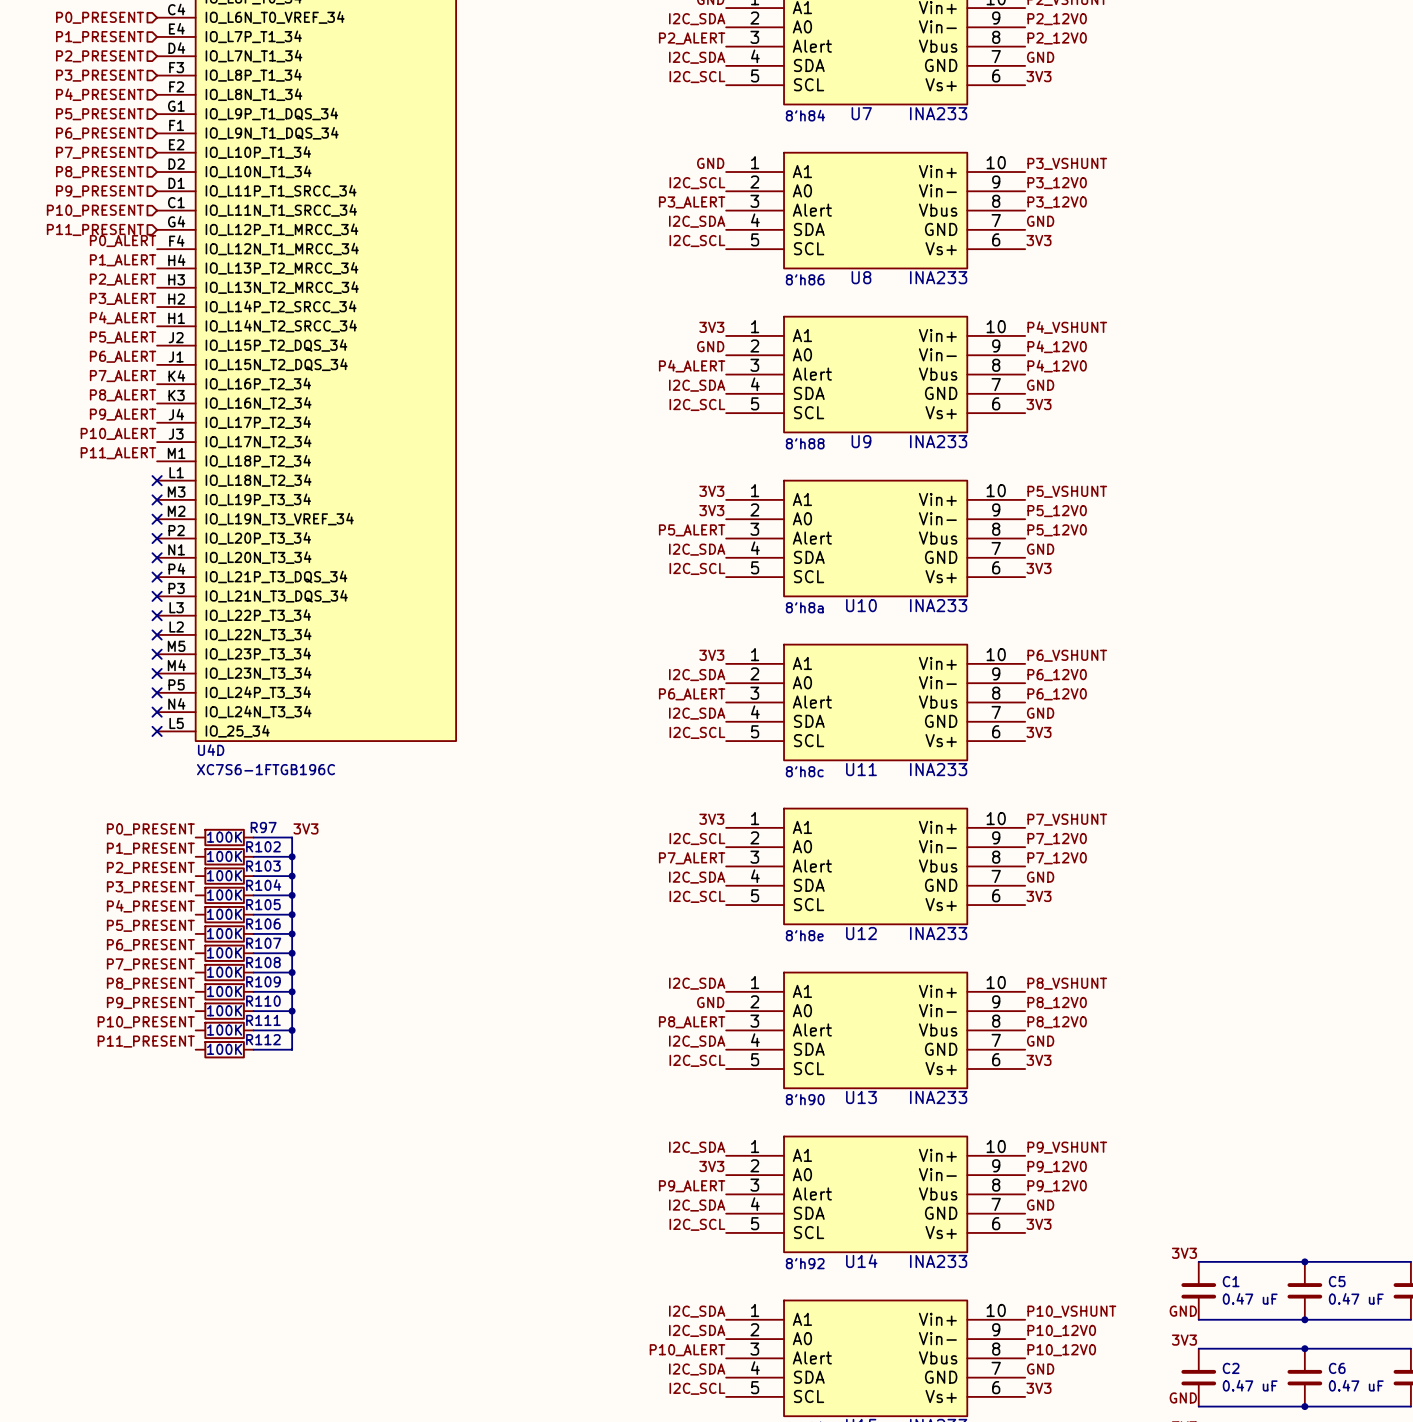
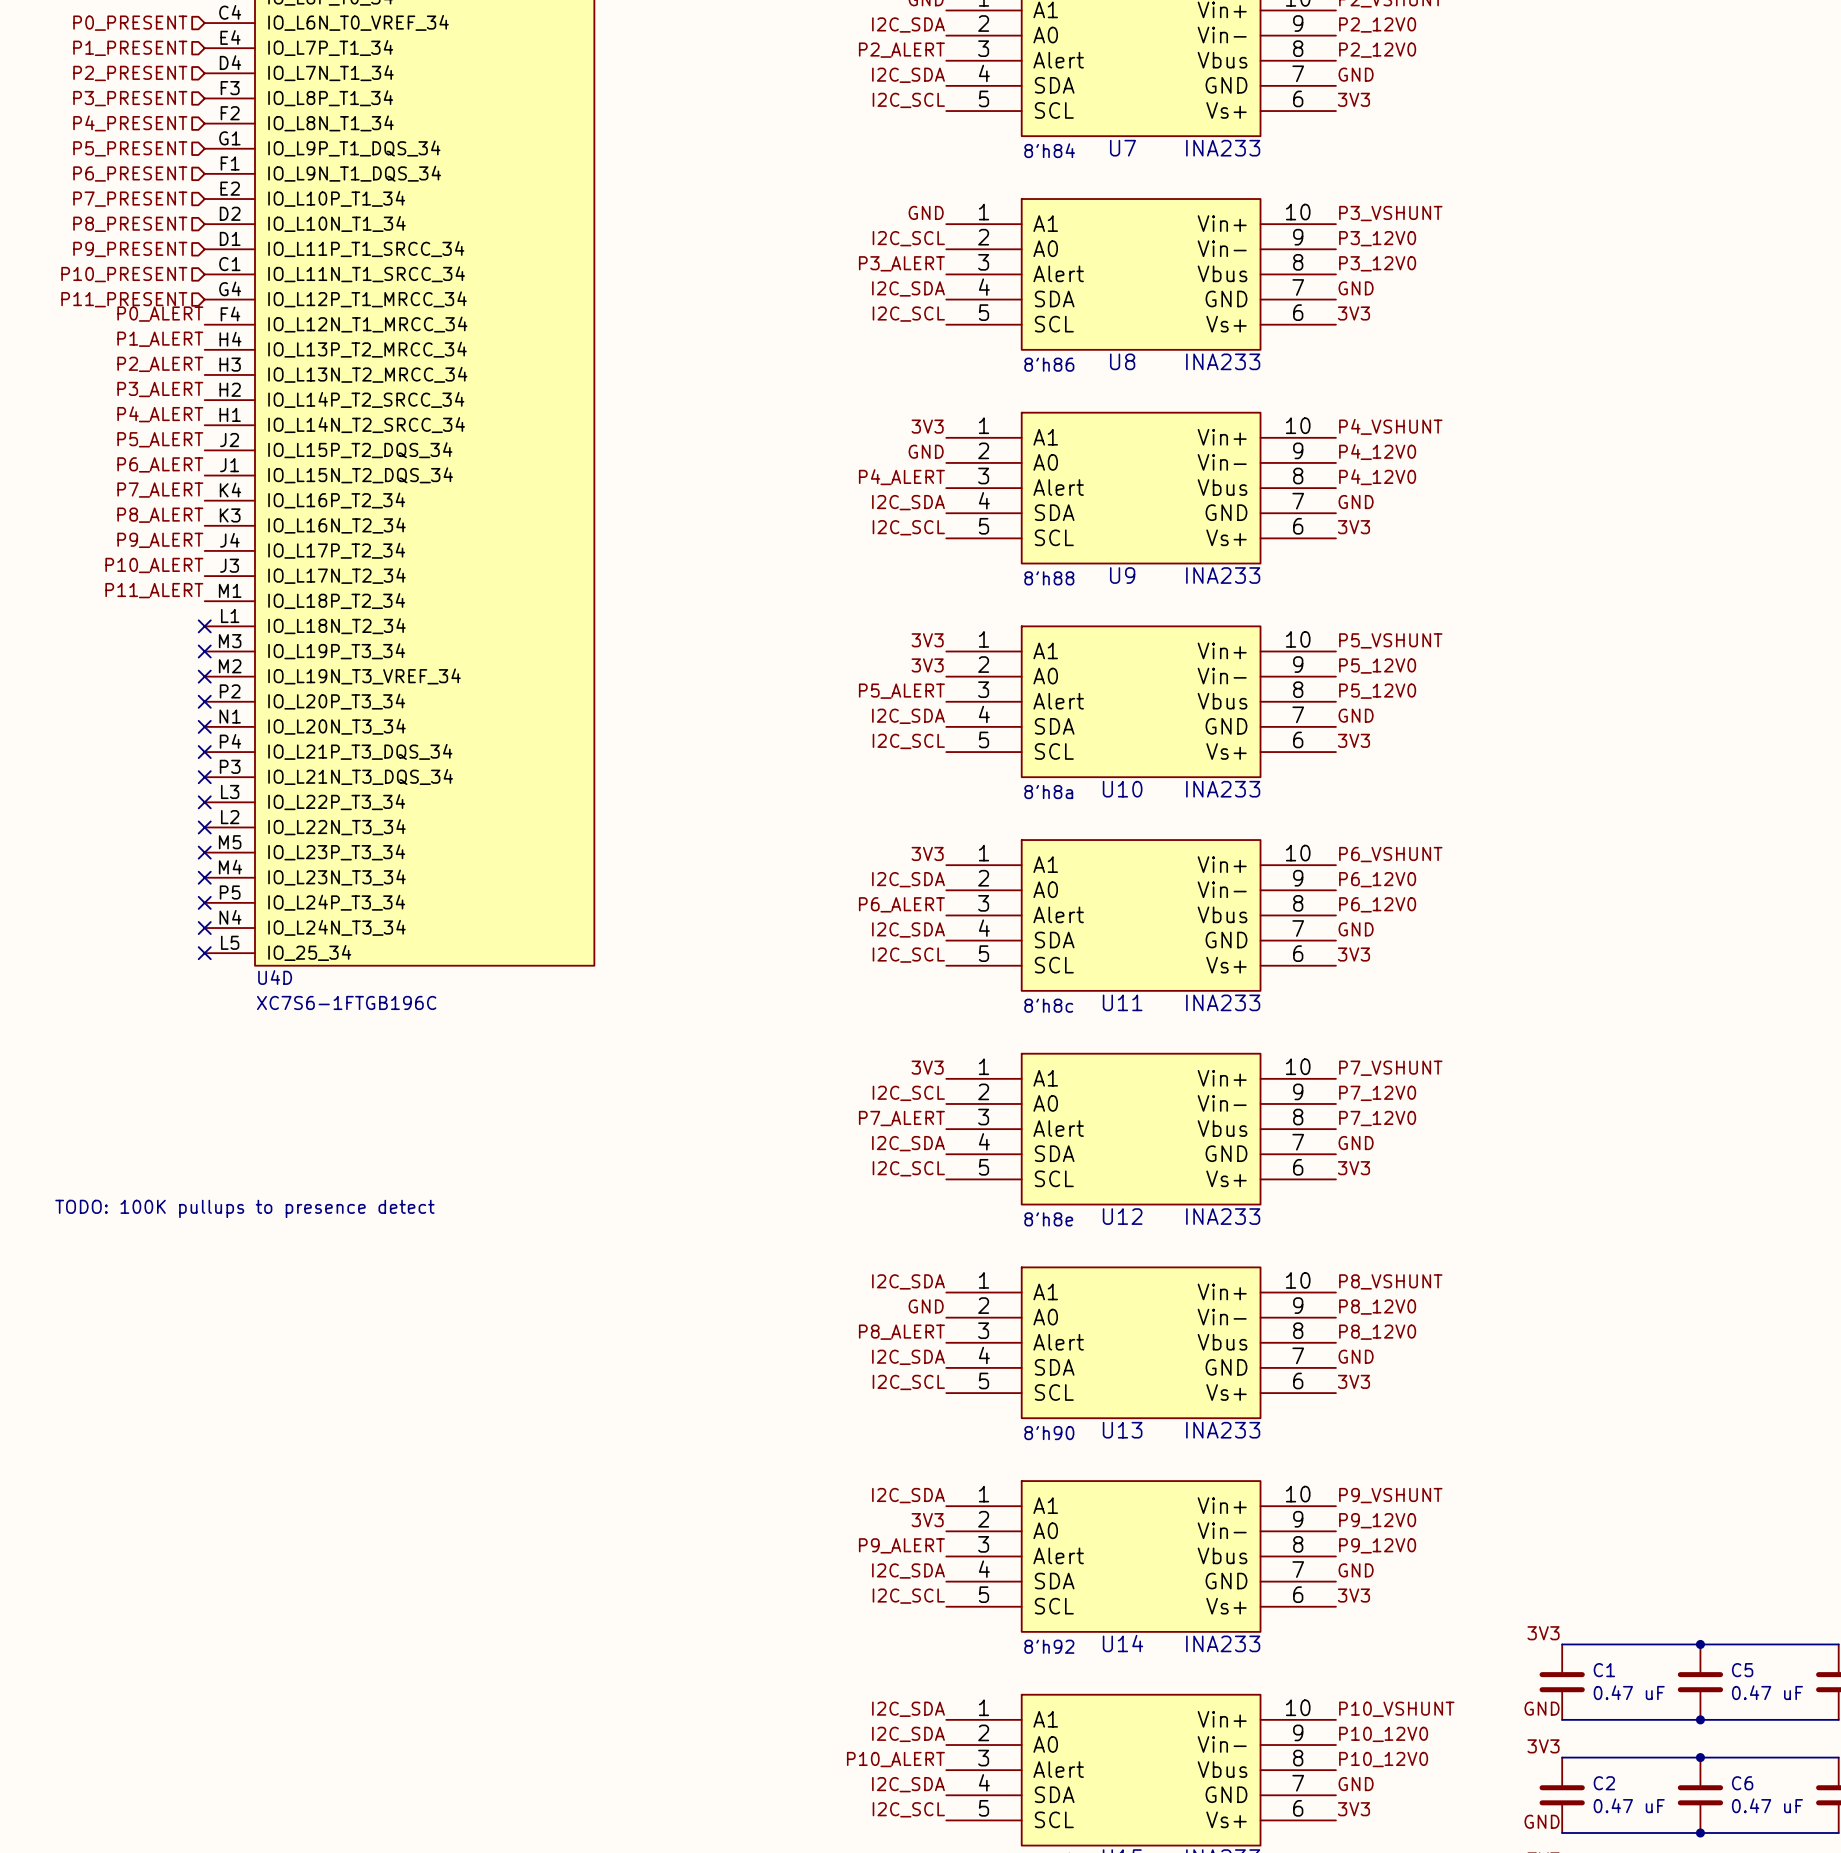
label: 3V3 (305, 828) -> none
label: P0_PRESENT (150, 829) -> none
R97: 100K (224, 837) -> none
wire: (253, 837) (292, 837) (292, 1049) (253, 1049) -> none
label: P1_PRESENT (150, 848) -> none
R102: 100K (224, 856) -> none
wire: (253, 856) (292, 856) -> none
junction: (292, 856) -> none
label: P2_PRESENT (150, 867) -> none
R103: 100K (224, 876) -> none
wire: (253, 876) (292, 876) -> none
junction: (292, 876) -> none
label: P3_PRESENT (150, 887) -> none
R104: 100K (224, 895) -> none
wire: (253, 895) (292, 895) -> none
junction: (292, 895) -> none
label: P4_PRESENT (150, 906) -> none
R105: 100K (224, 914) -> none
wire: (253, 914) (292, 914) -> none
junction: (292, 914) -> none
label: P5_PRESENT (150, 925) -> none
text: none -> TODO: 100K pullups to presence detect (244, 1208)
R106: 100K (224, 933) -> none
wire: (253, 933) (292, 933) -> none
junction: (292, 933) -> none
label: P6_PRESENT (150, 945) -> none
R107: 100K (224, 953) -> none
wire: (253, 953) (292, 953) -> none
junction: (292, 953) -> none
label: P7_PRESENT (150, 964) -> none
R108: 100K (224, 972) -> none
wire: (253, 972) (292, 972) -> none
junction: (292, 972) -> none
label: P8_PRESENT (150, 983) -> none
R109: 100K (224, 991) -> none
wire: (253, 991) (292, 991) -> none
junction: (292, 991) -> none
label: P9_PRESENT (150, 1002) -> none
R110: 100K (224, 1011) -> none
wire: (253, 1011) (292, 1011) -> none
junction: (292, 1011) -> none
label: P10_PRESENT (146, 1022) -> none
R111: 100K (224, 1030) -> none
wire: (253, 1030) (292, 1030) -> none
junction: (292, 1030) -> none
label: P11_PRESENT (146, 1041) -> none
R112: 100K (224, 1049) -> none

